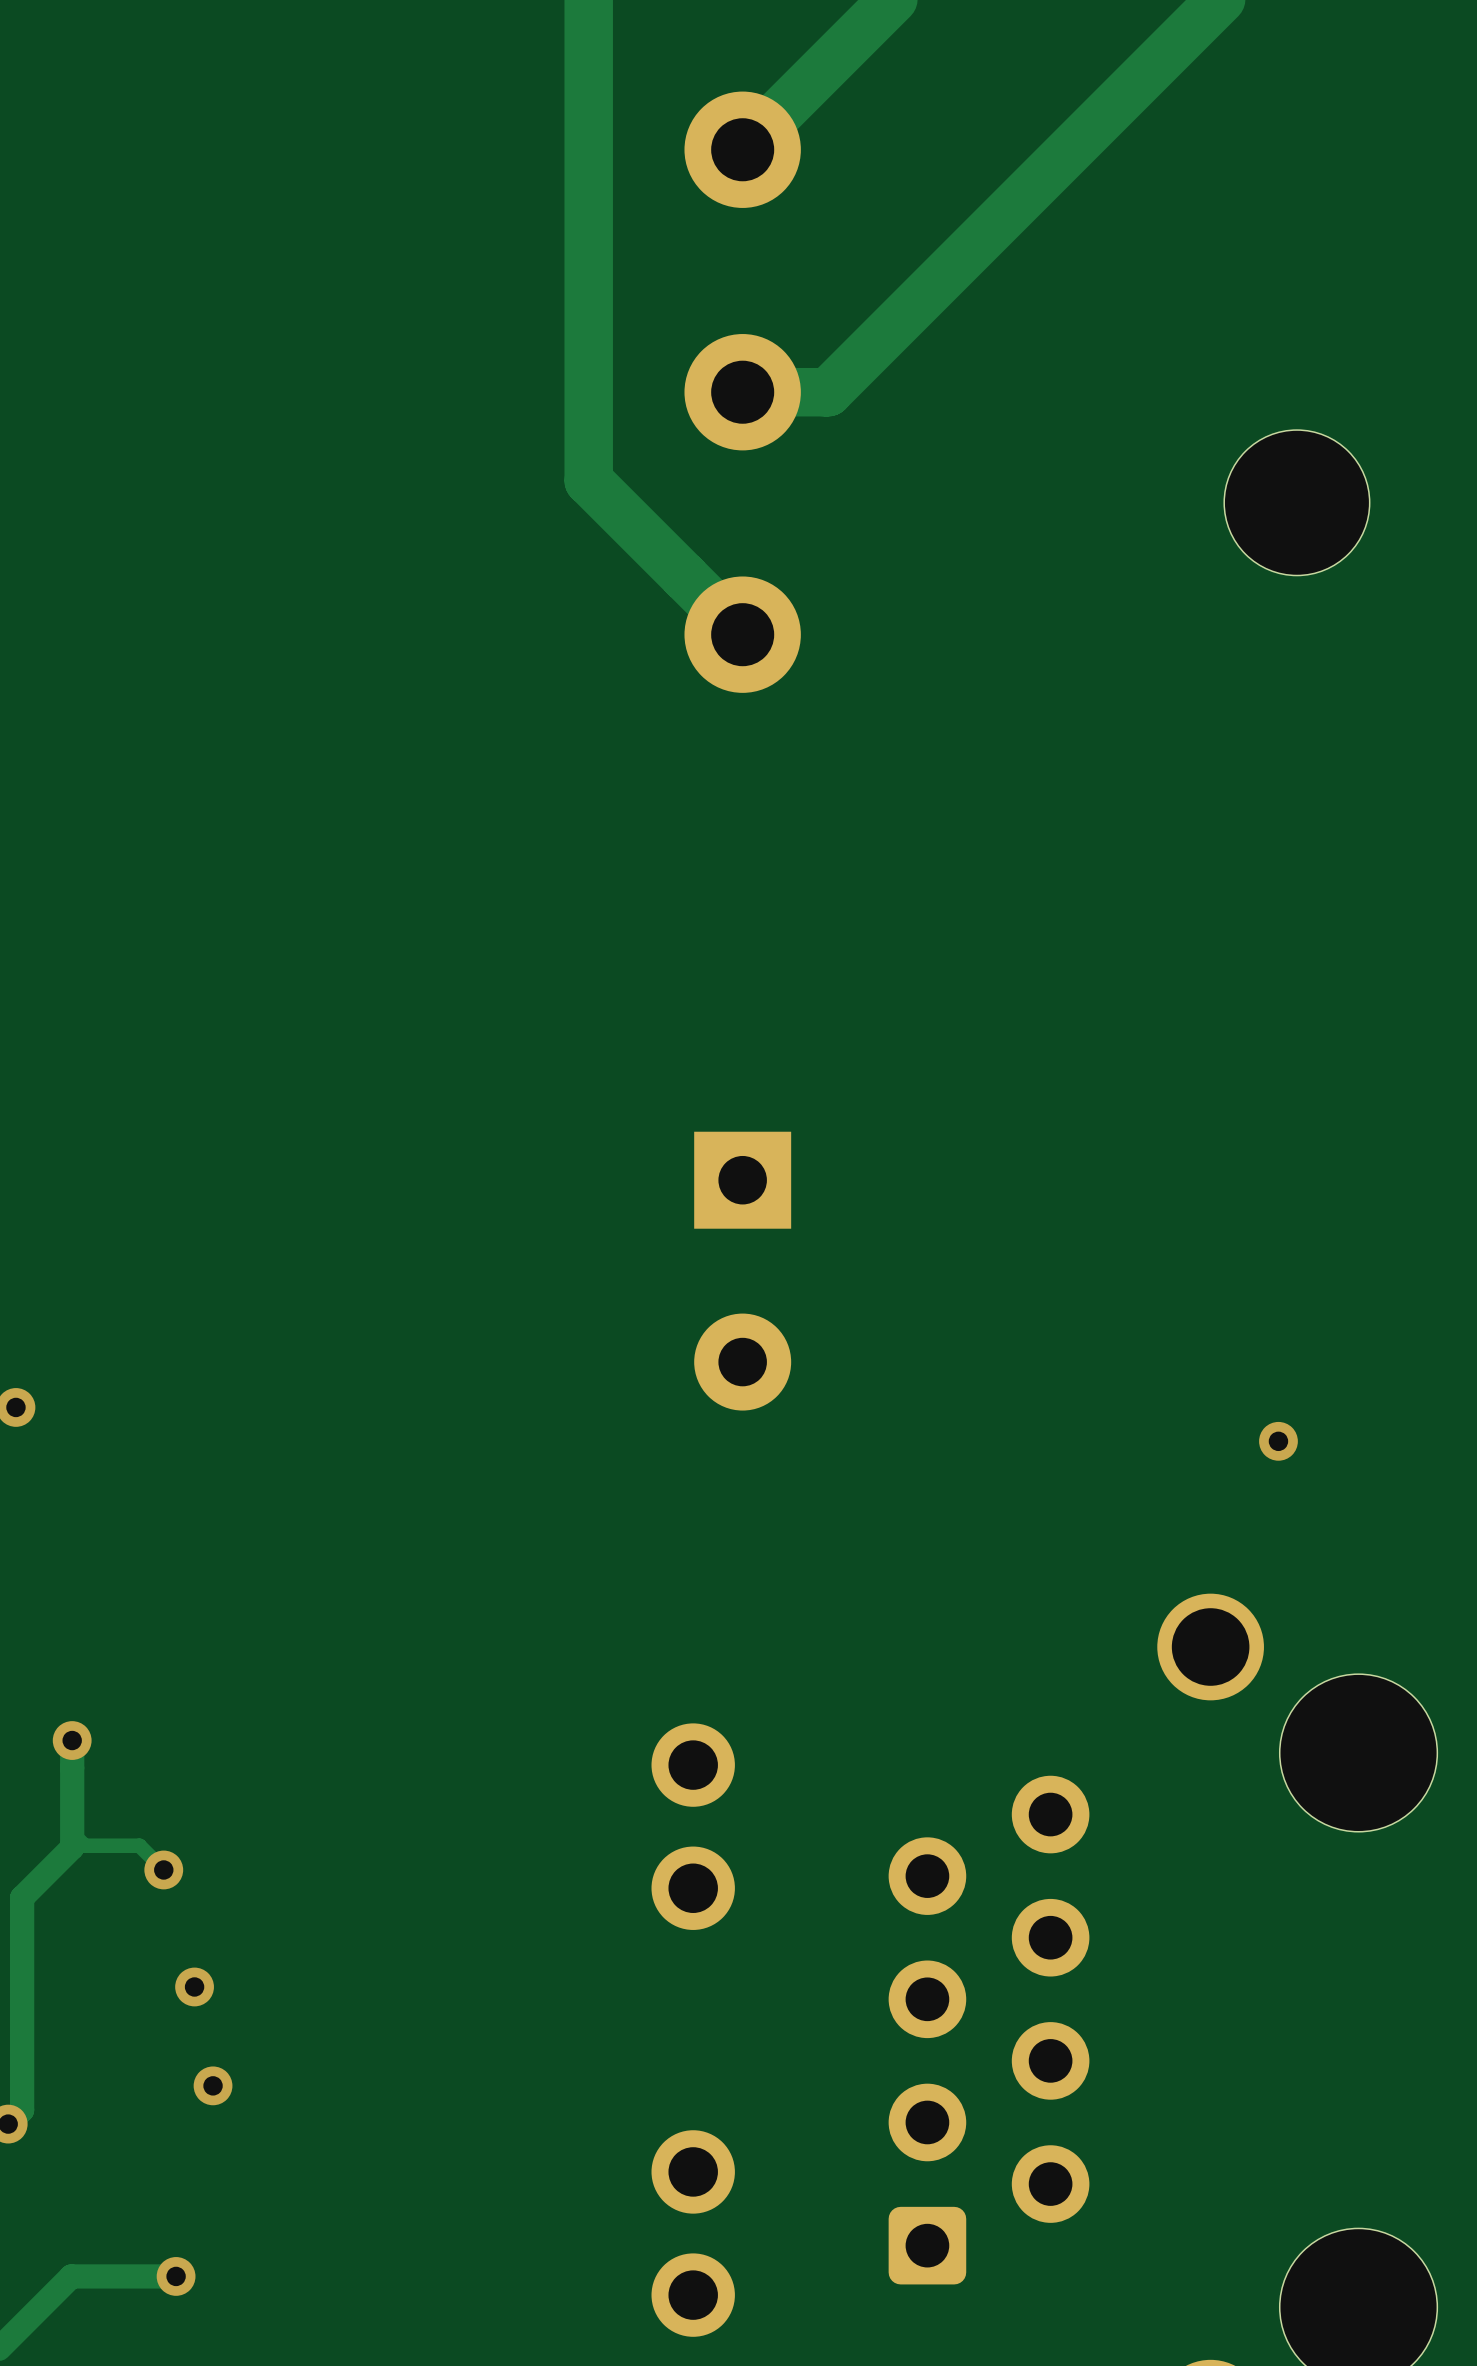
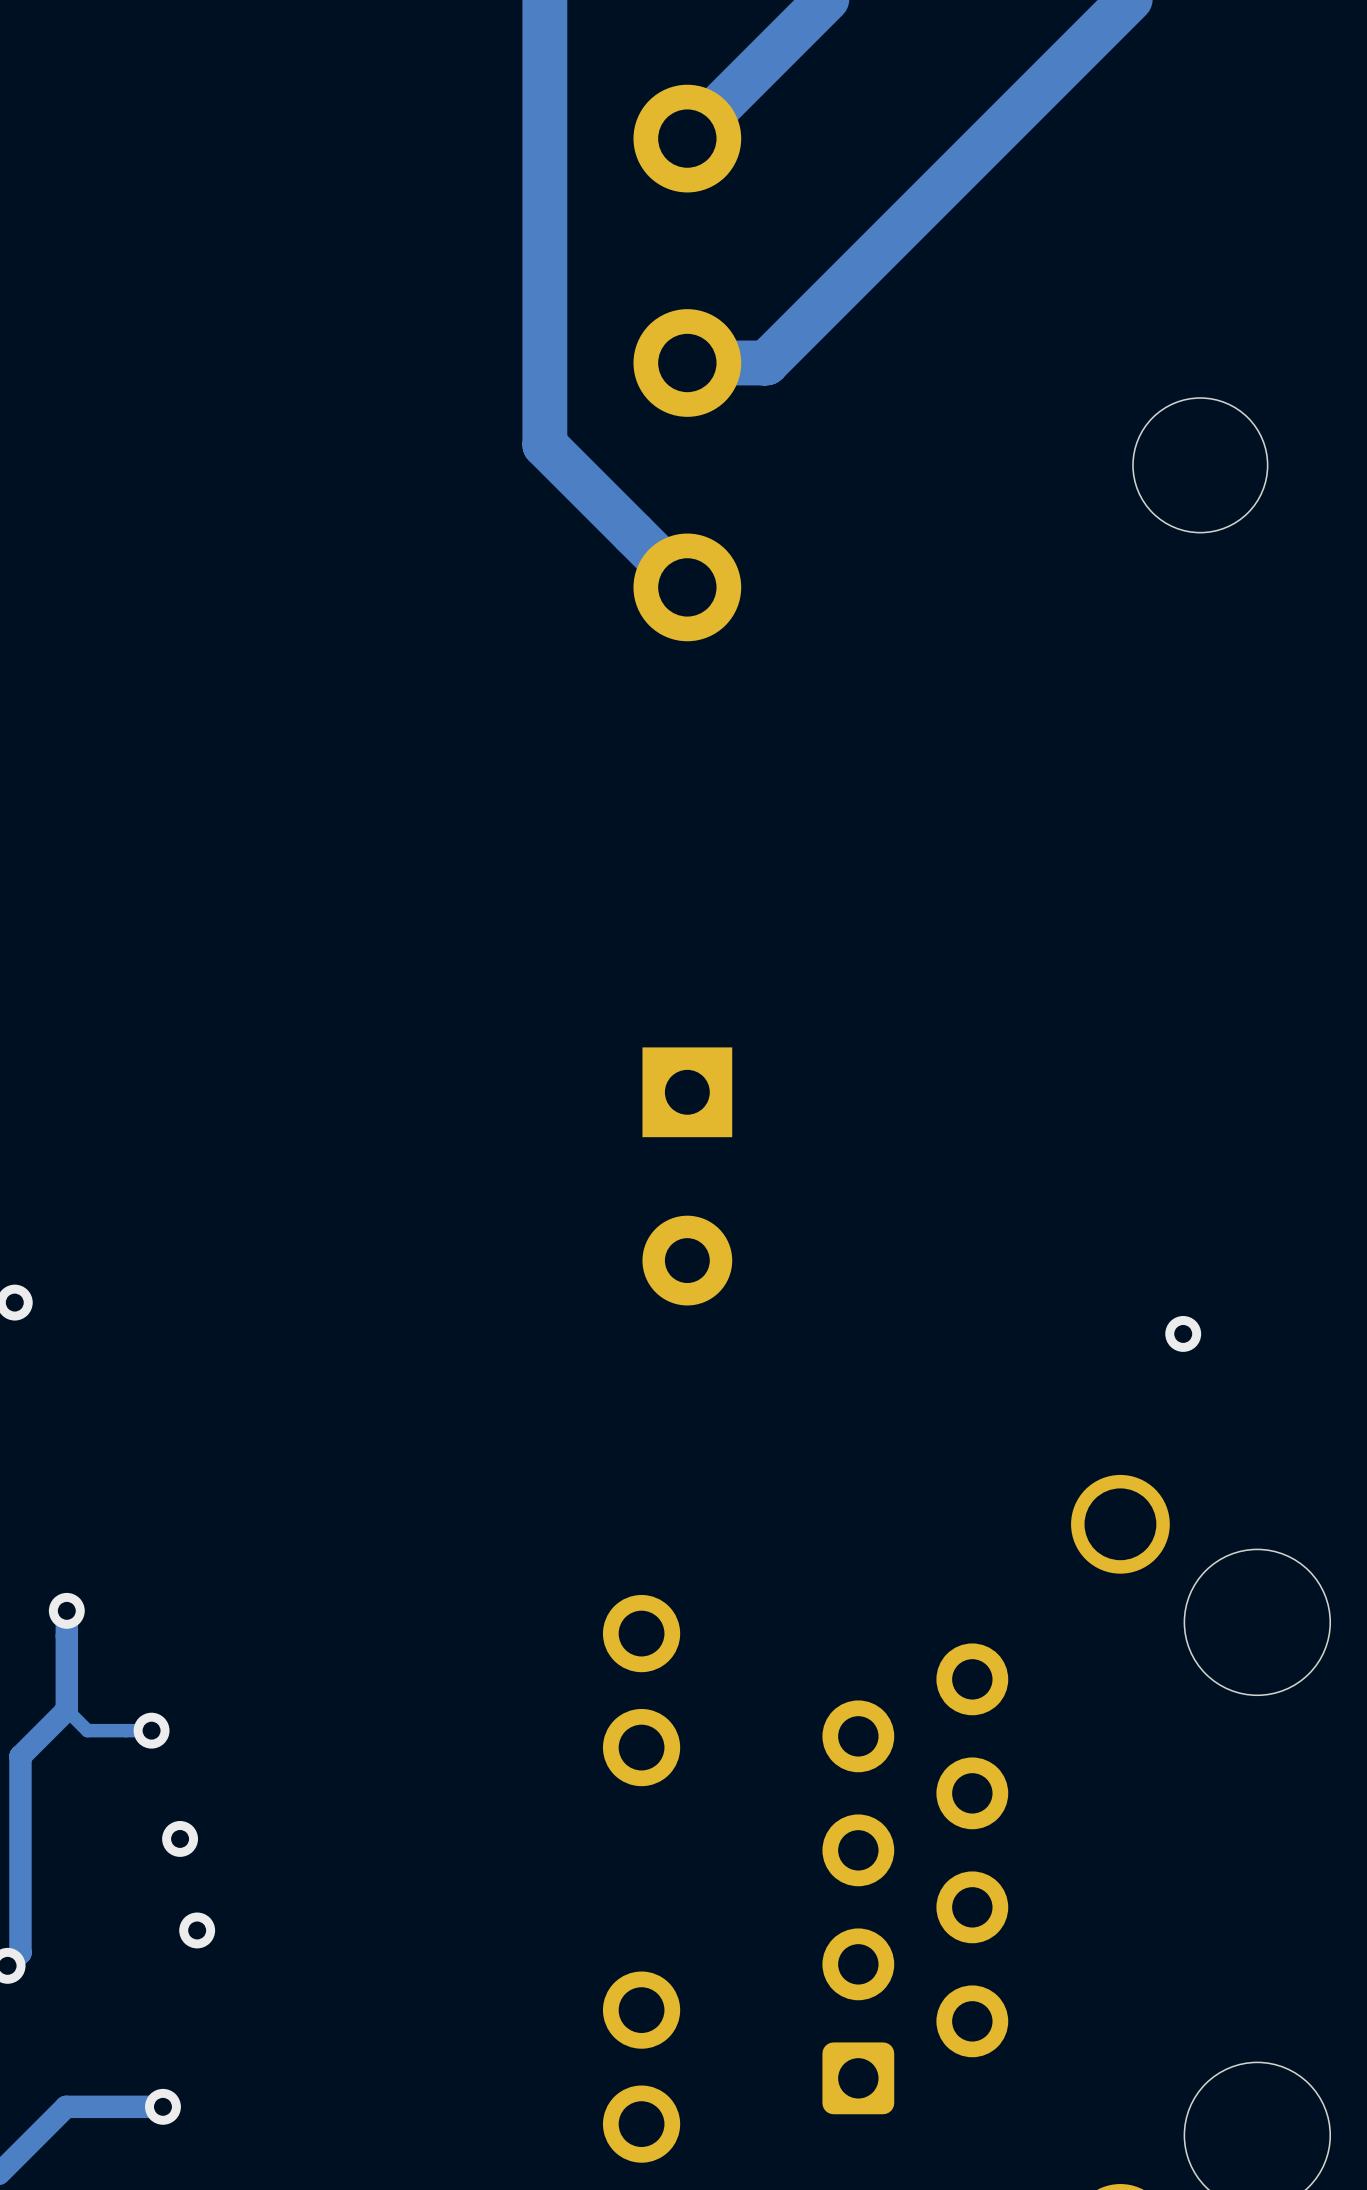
track: (72, 1833) (84, 1845) (139, 1845) (163, 1869) -> (66, 1710) (87, 1730) (151, 1730)

